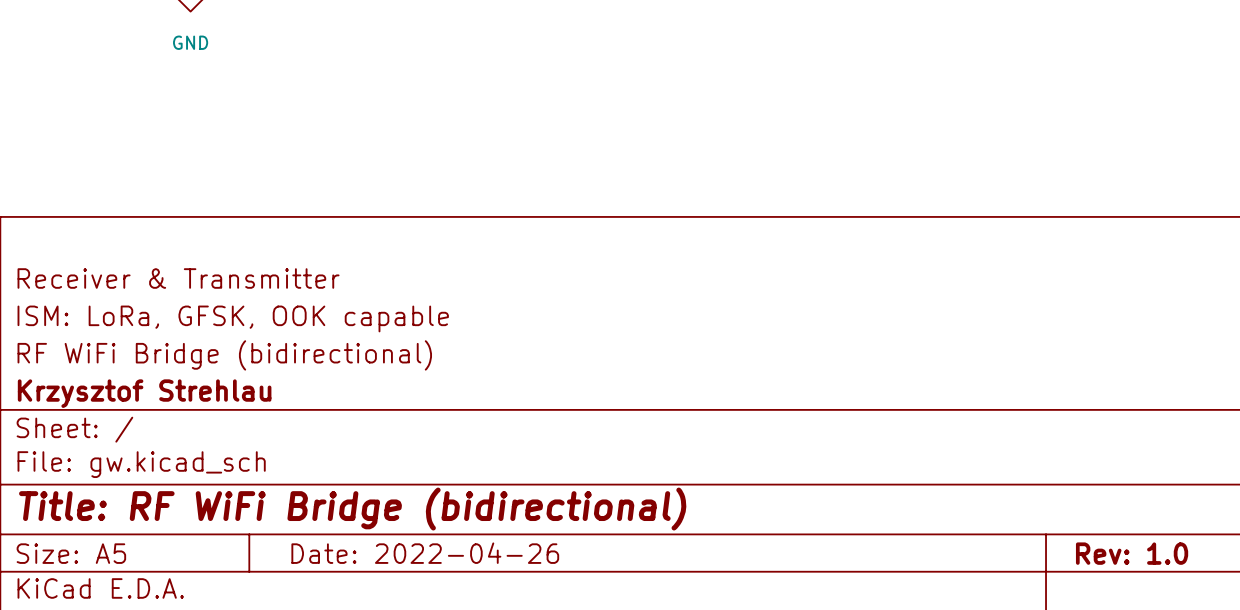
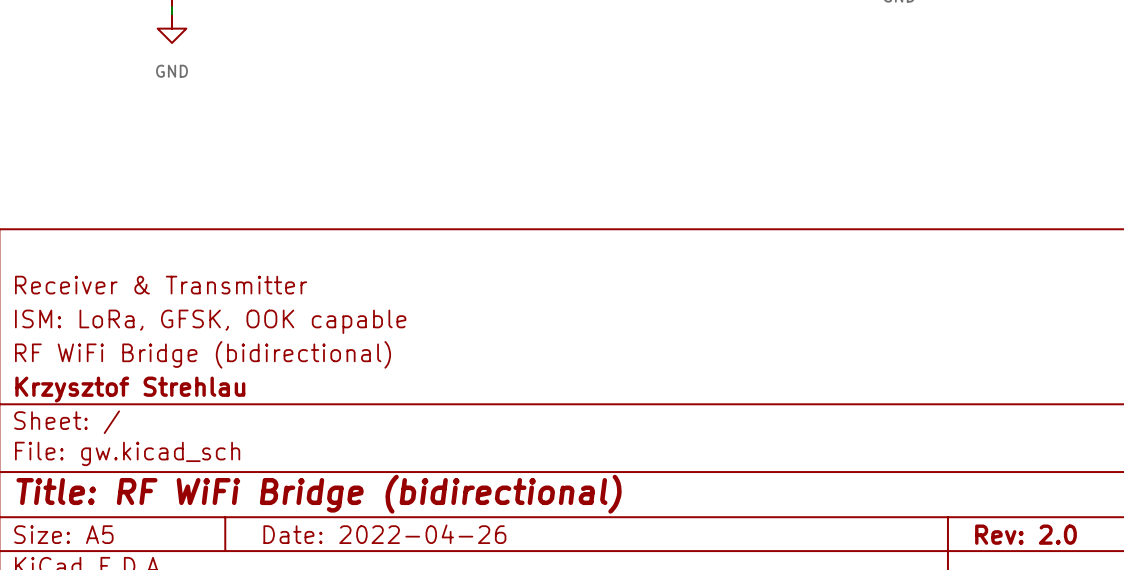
title block: Rev: 1.0 (1132, 553) -> Rev: 2.0 (1026, 534)

